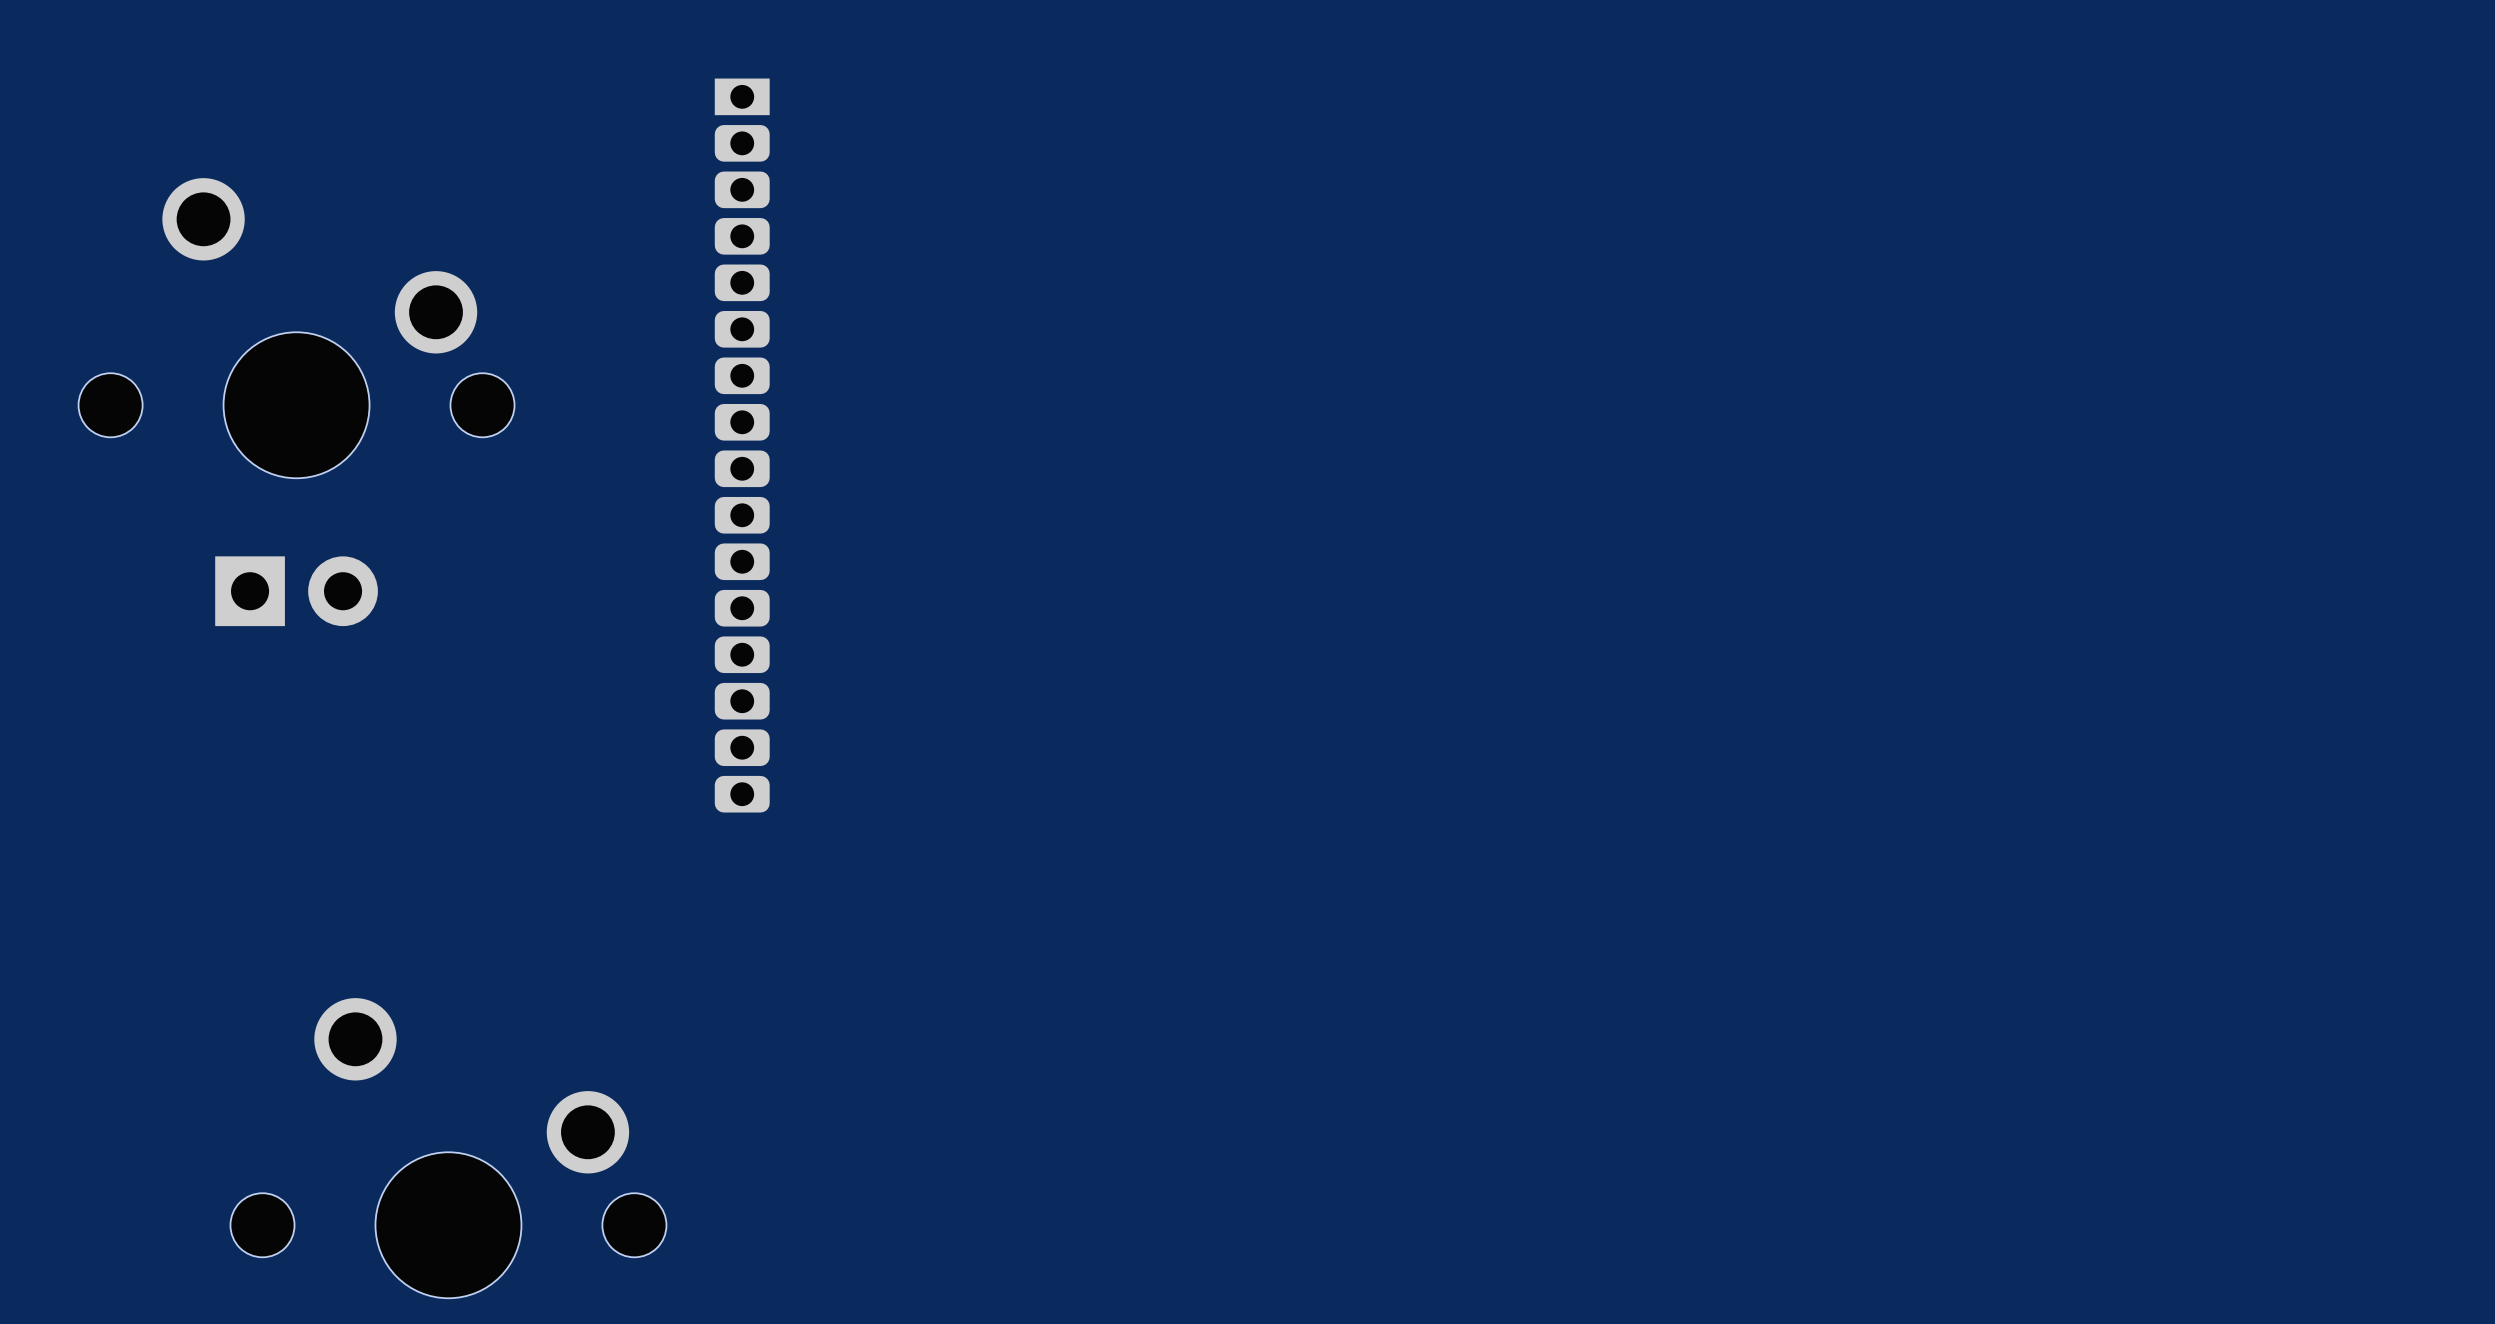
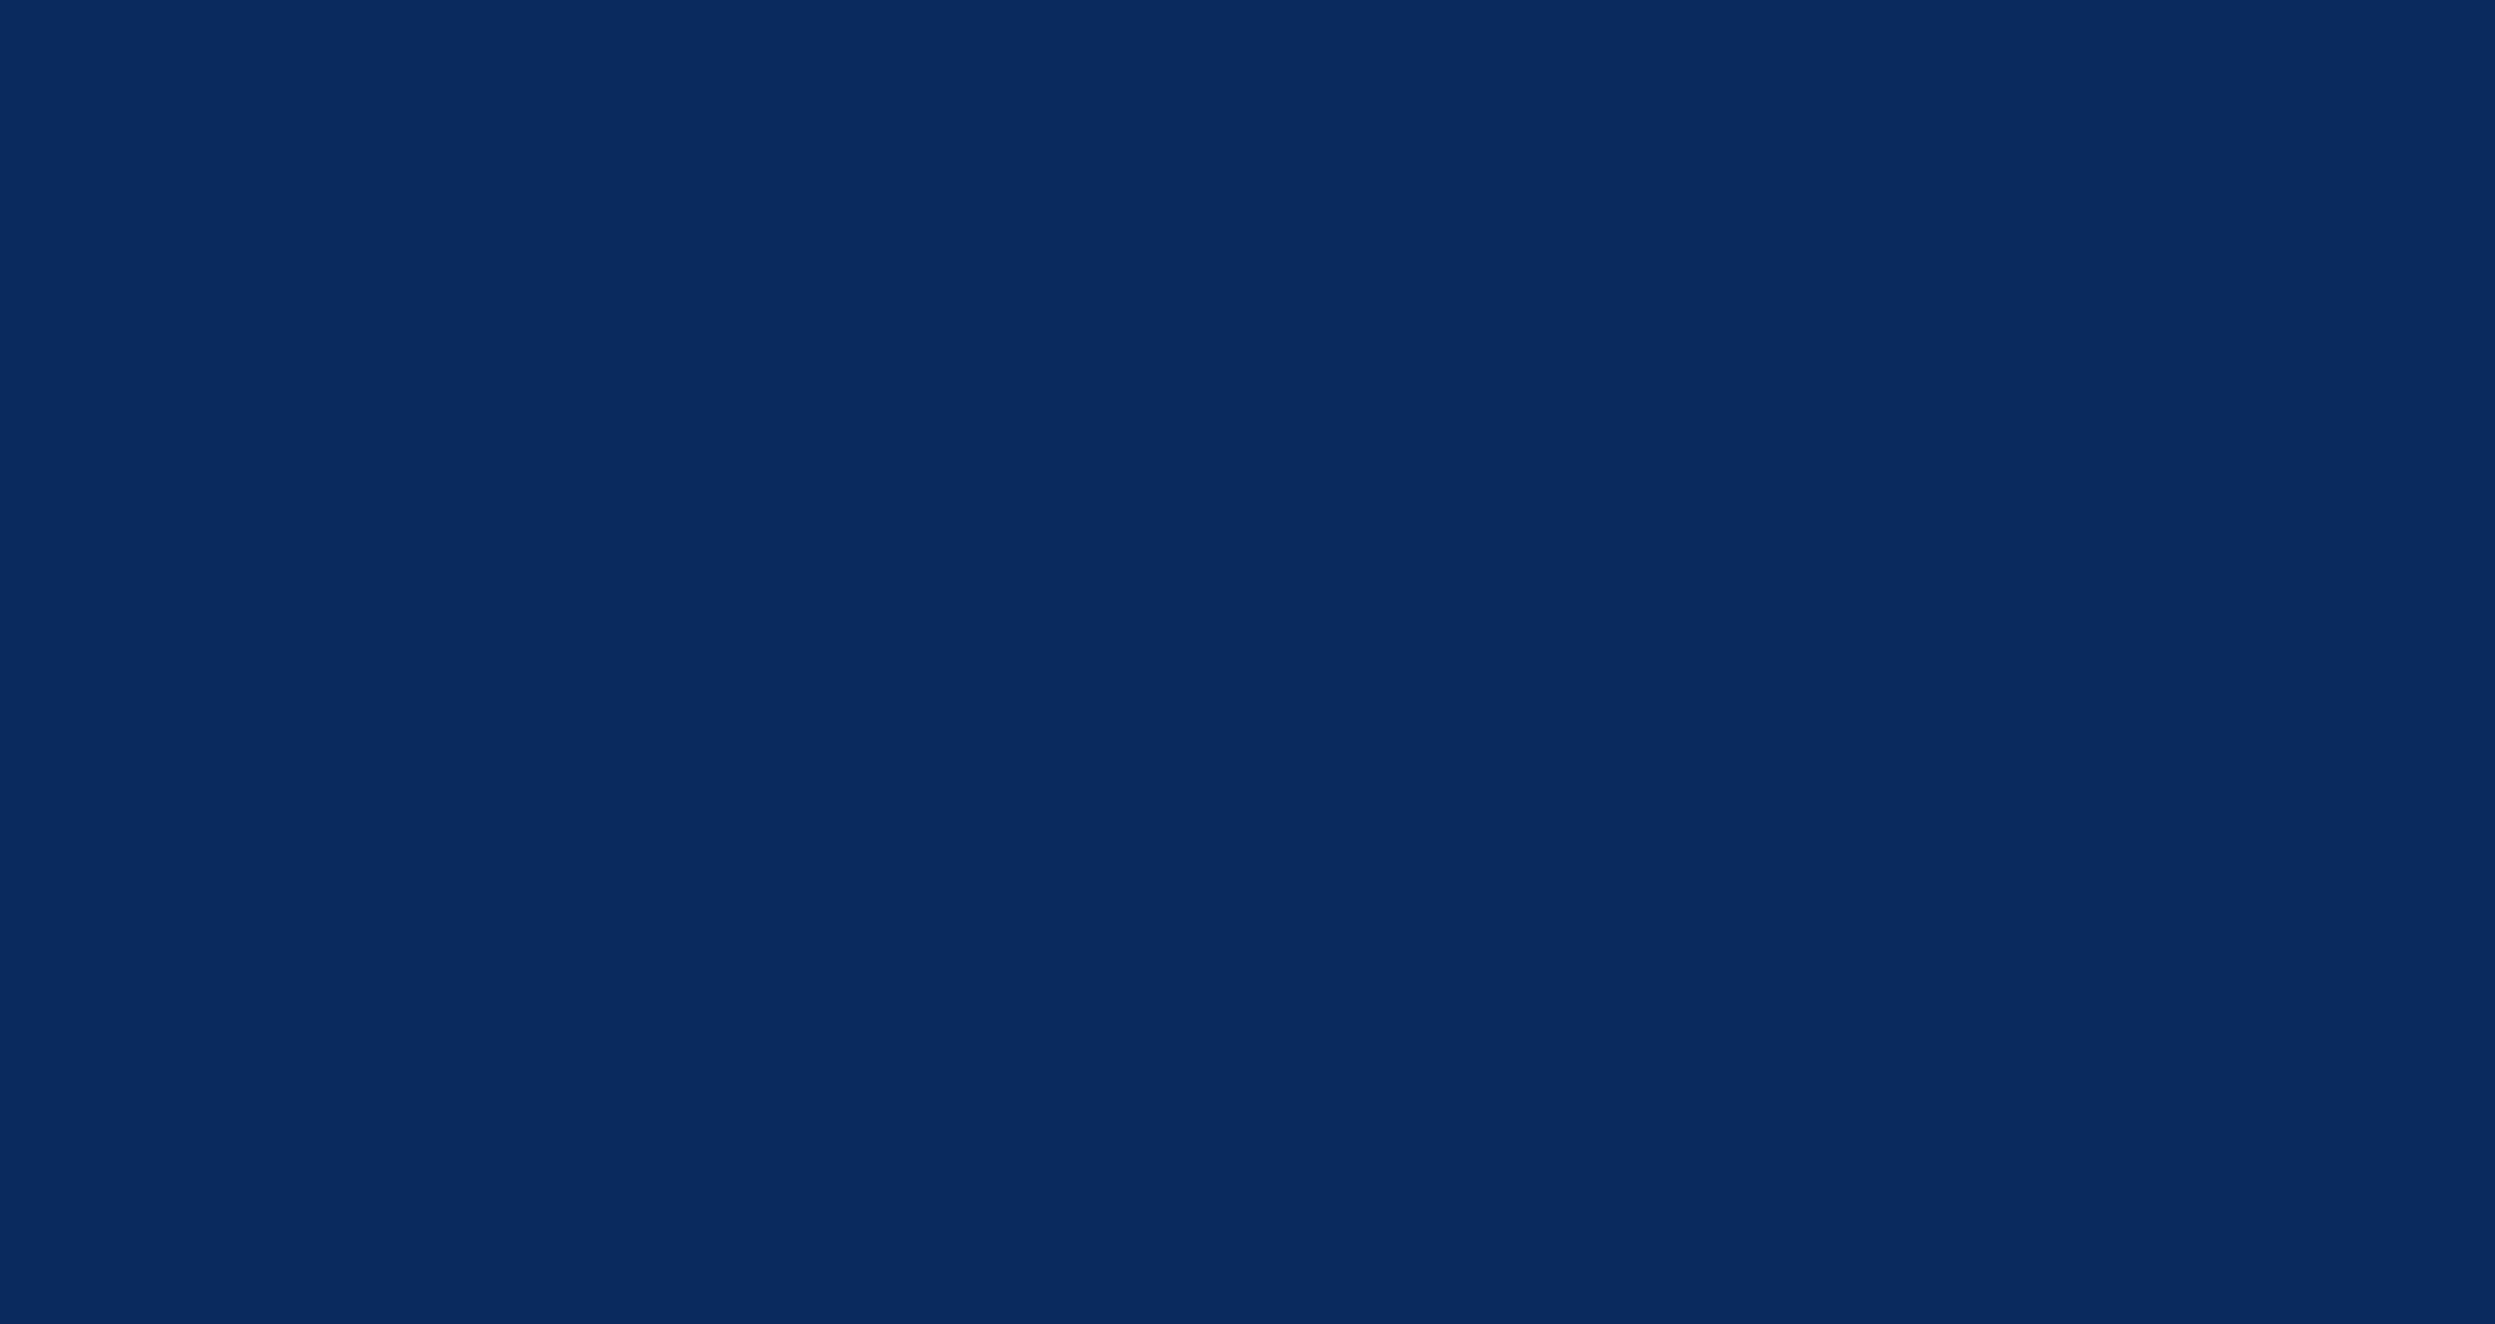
part: (296, 402) -> none
part: (742, 445) -> none
part: (448, 1148) -> none

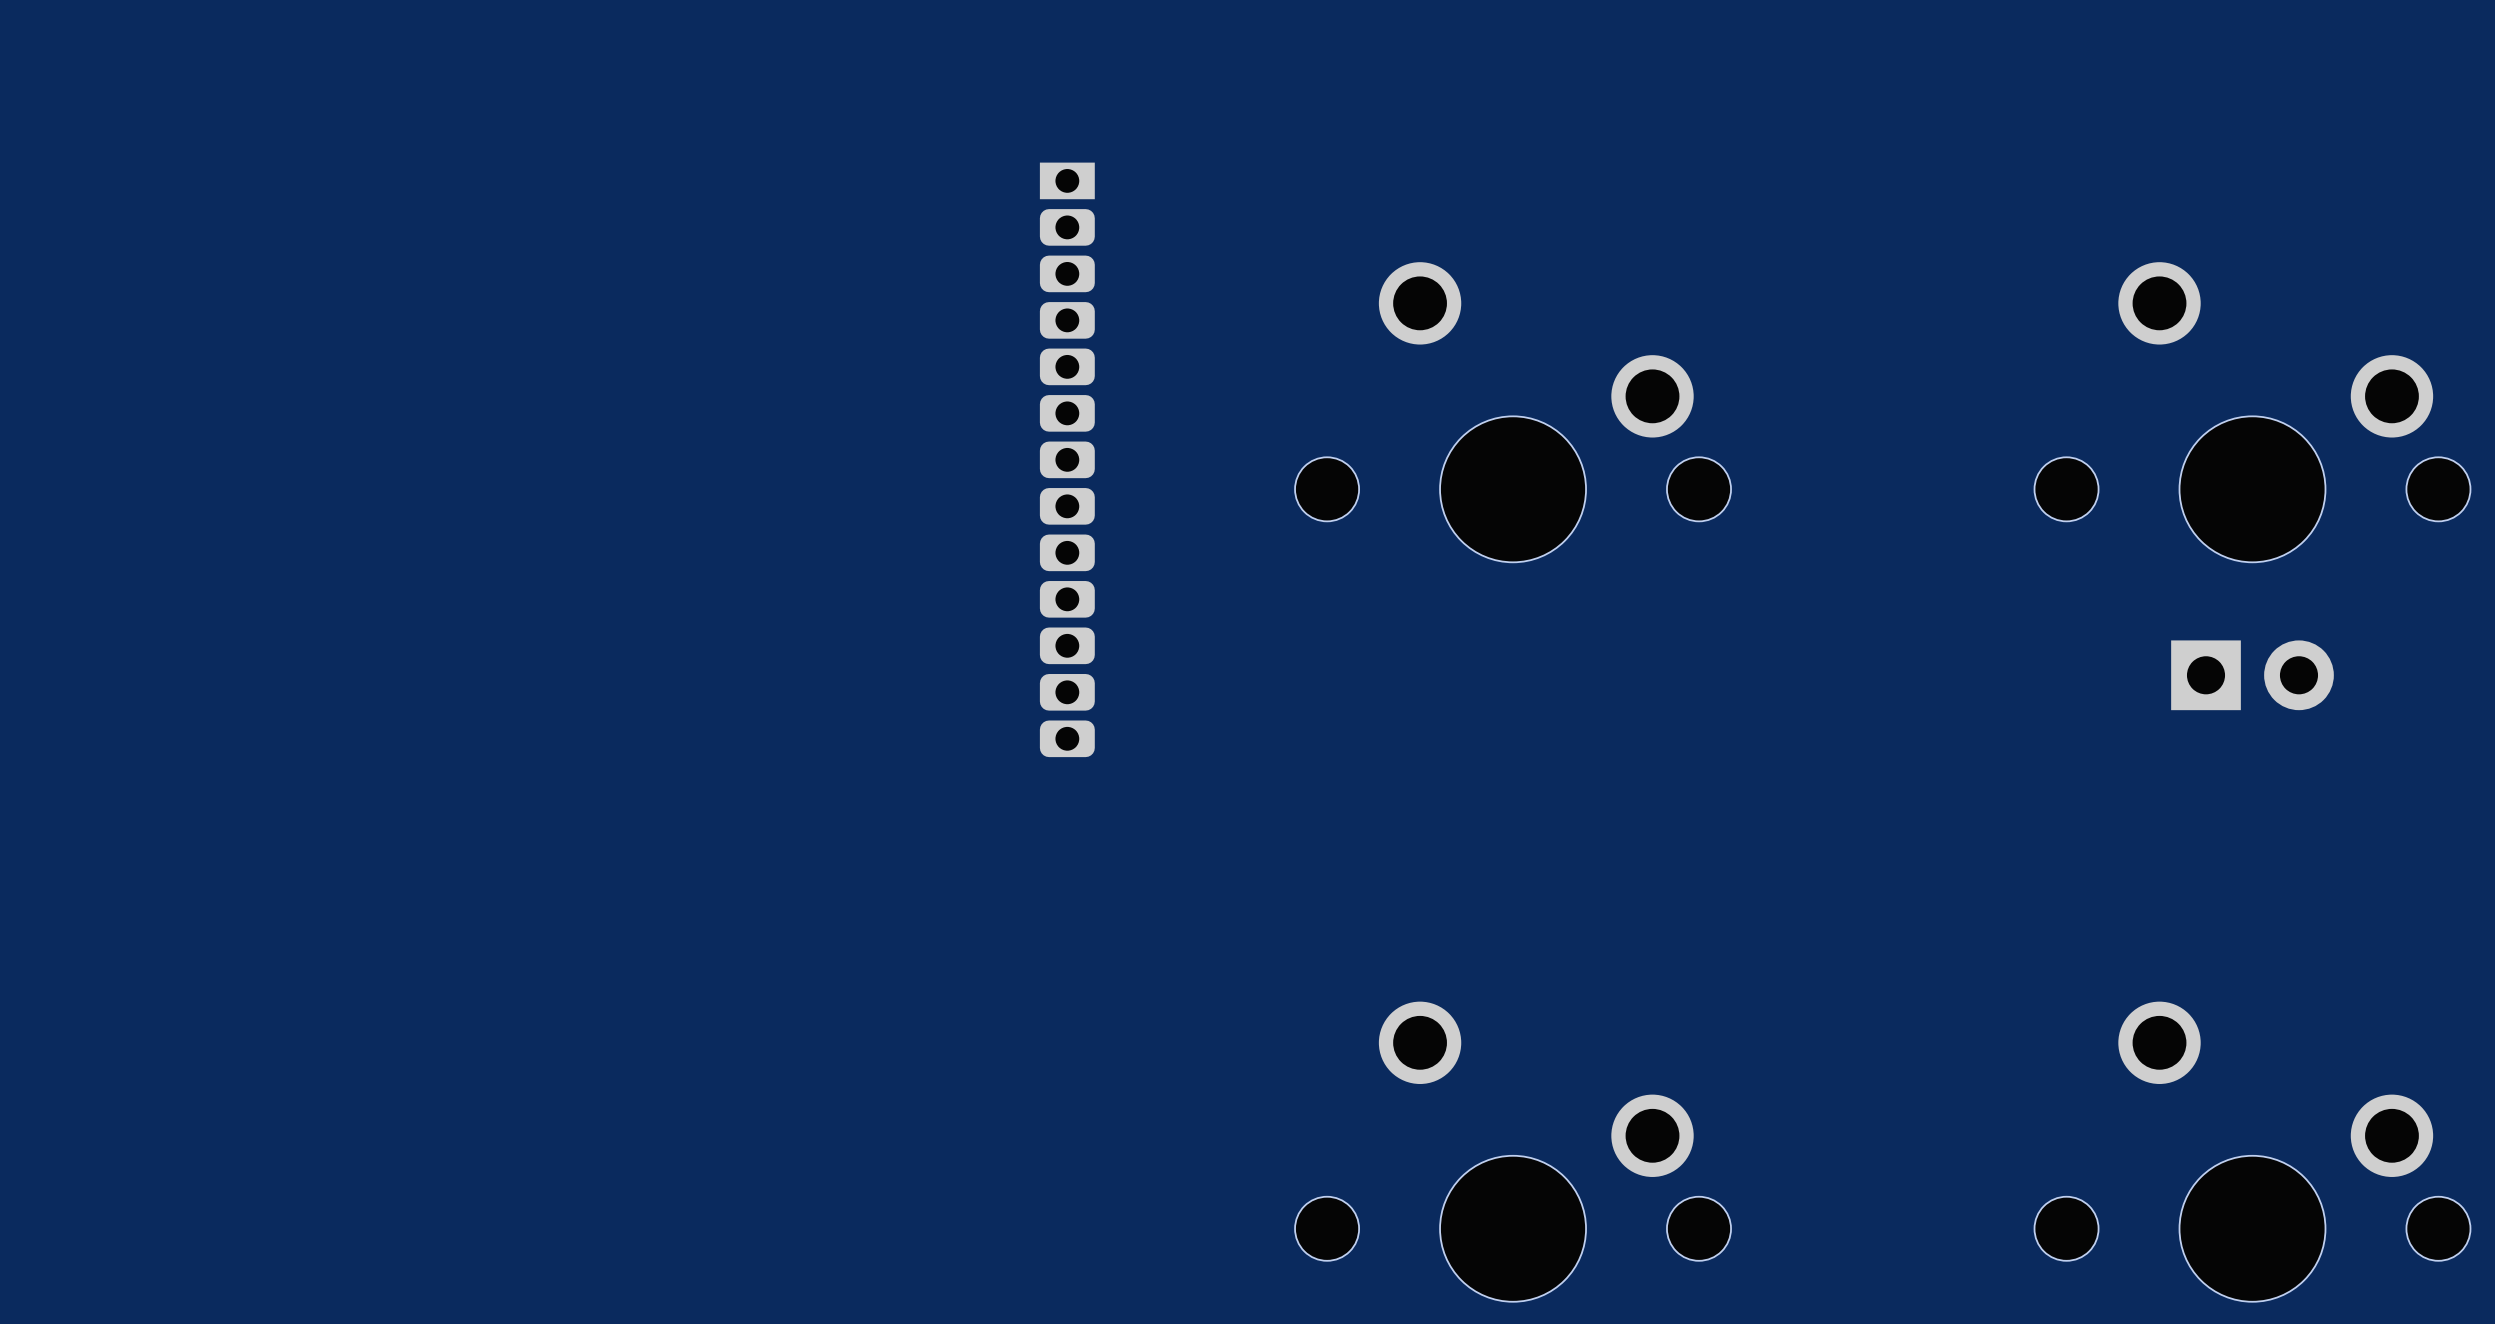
part: none -> (1513, 412)
part: none -> (1067, 459)
part: none -> (2252, 486)
part: none -> (1513, 1151)
part: none -> (2252, 1151)

